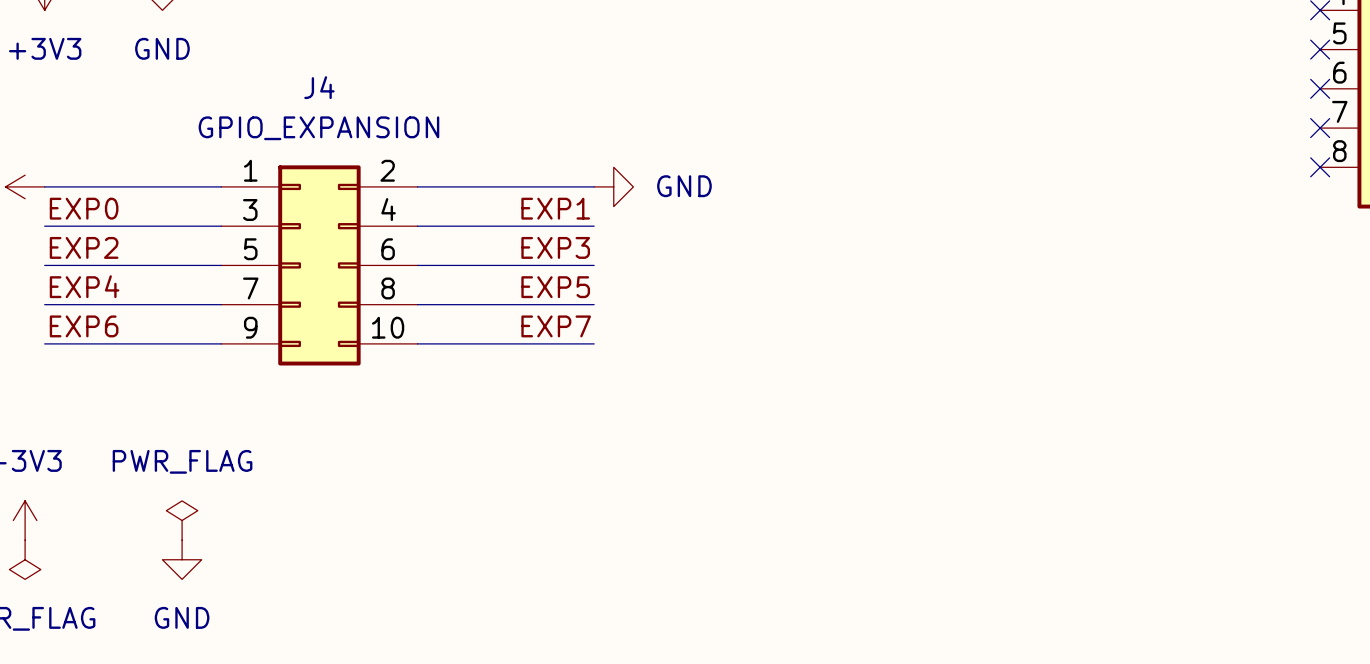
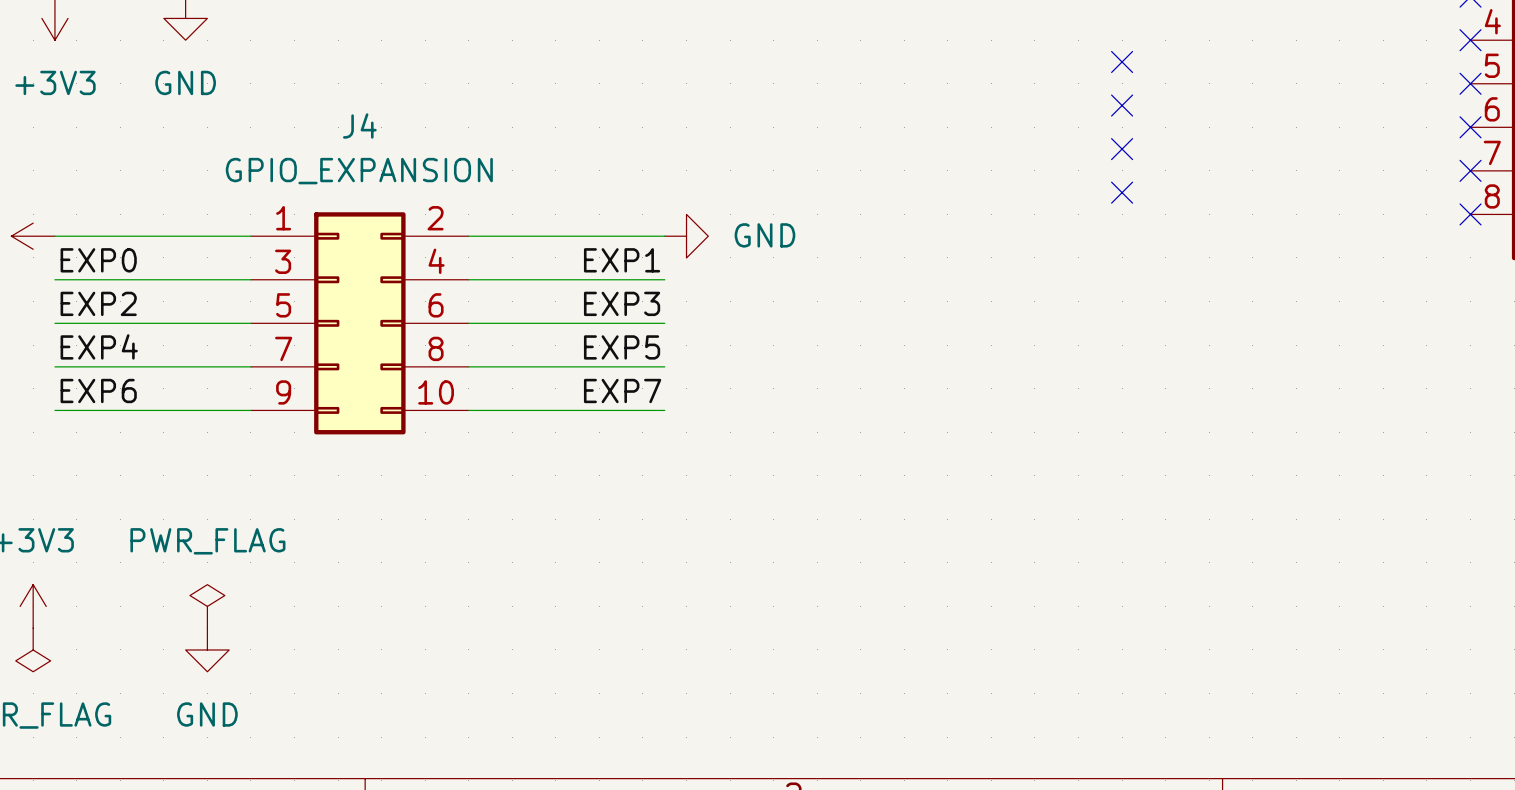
no-connect mark: none -> (1122, 61)
no-connect mark: none -> (1122, 105)
no-connect mark: none -> (1122, 149)
no-connect mark: none -> (1122, 192)

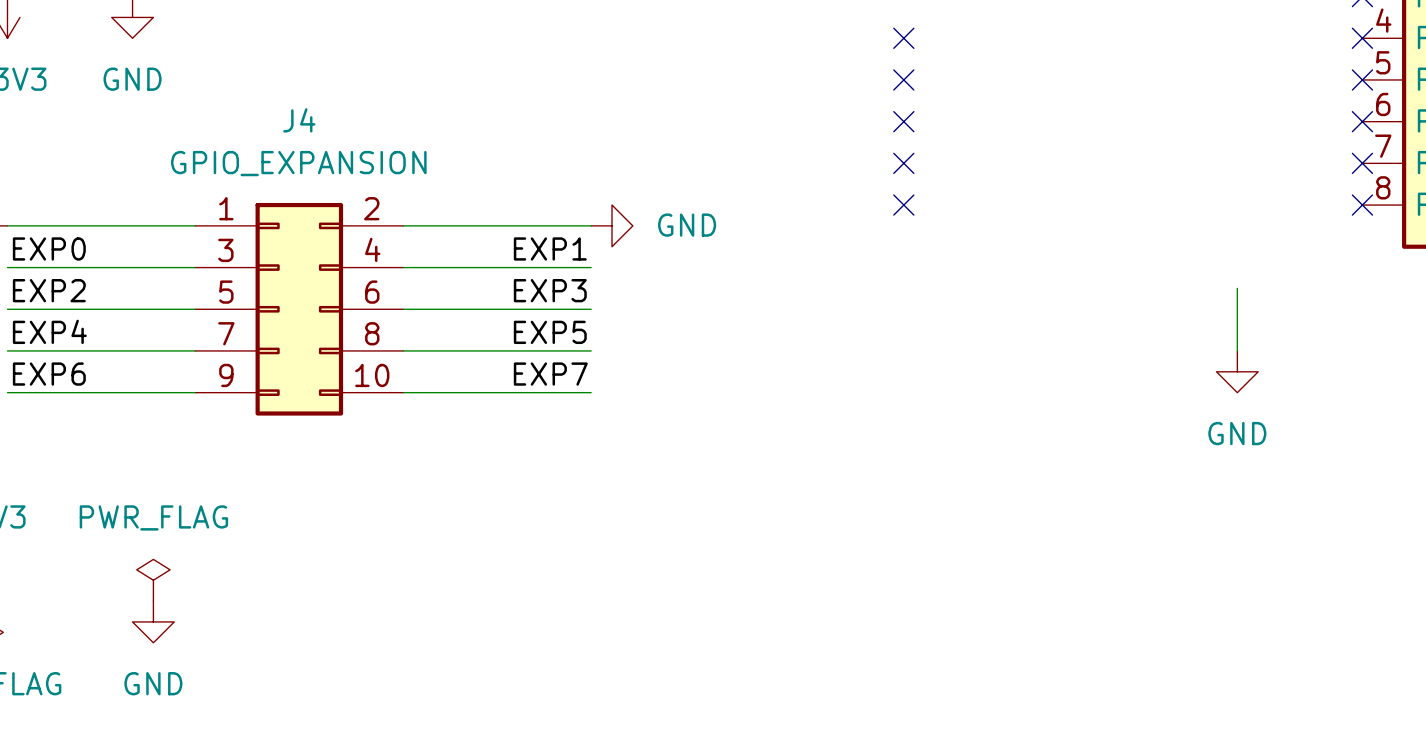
no-connect mark: none -> (903, 38)
no-connect mark: (1122, 61) -> none
no-connect mark: none -> (903, 79)
no-connect mark: (1122, 105) -> none
no-connect mark: none -> (903, 121)
no-connect mark: (1122, 149) -> none
no-connect mark: none -> (903, 163)
no-connect mark: (1122, 192) -> none
no-connect mark: none -> (903, 205)
wire: none -> (1237, 288) (1237, 350)
power symbol: none -> GND (1237, 371)

